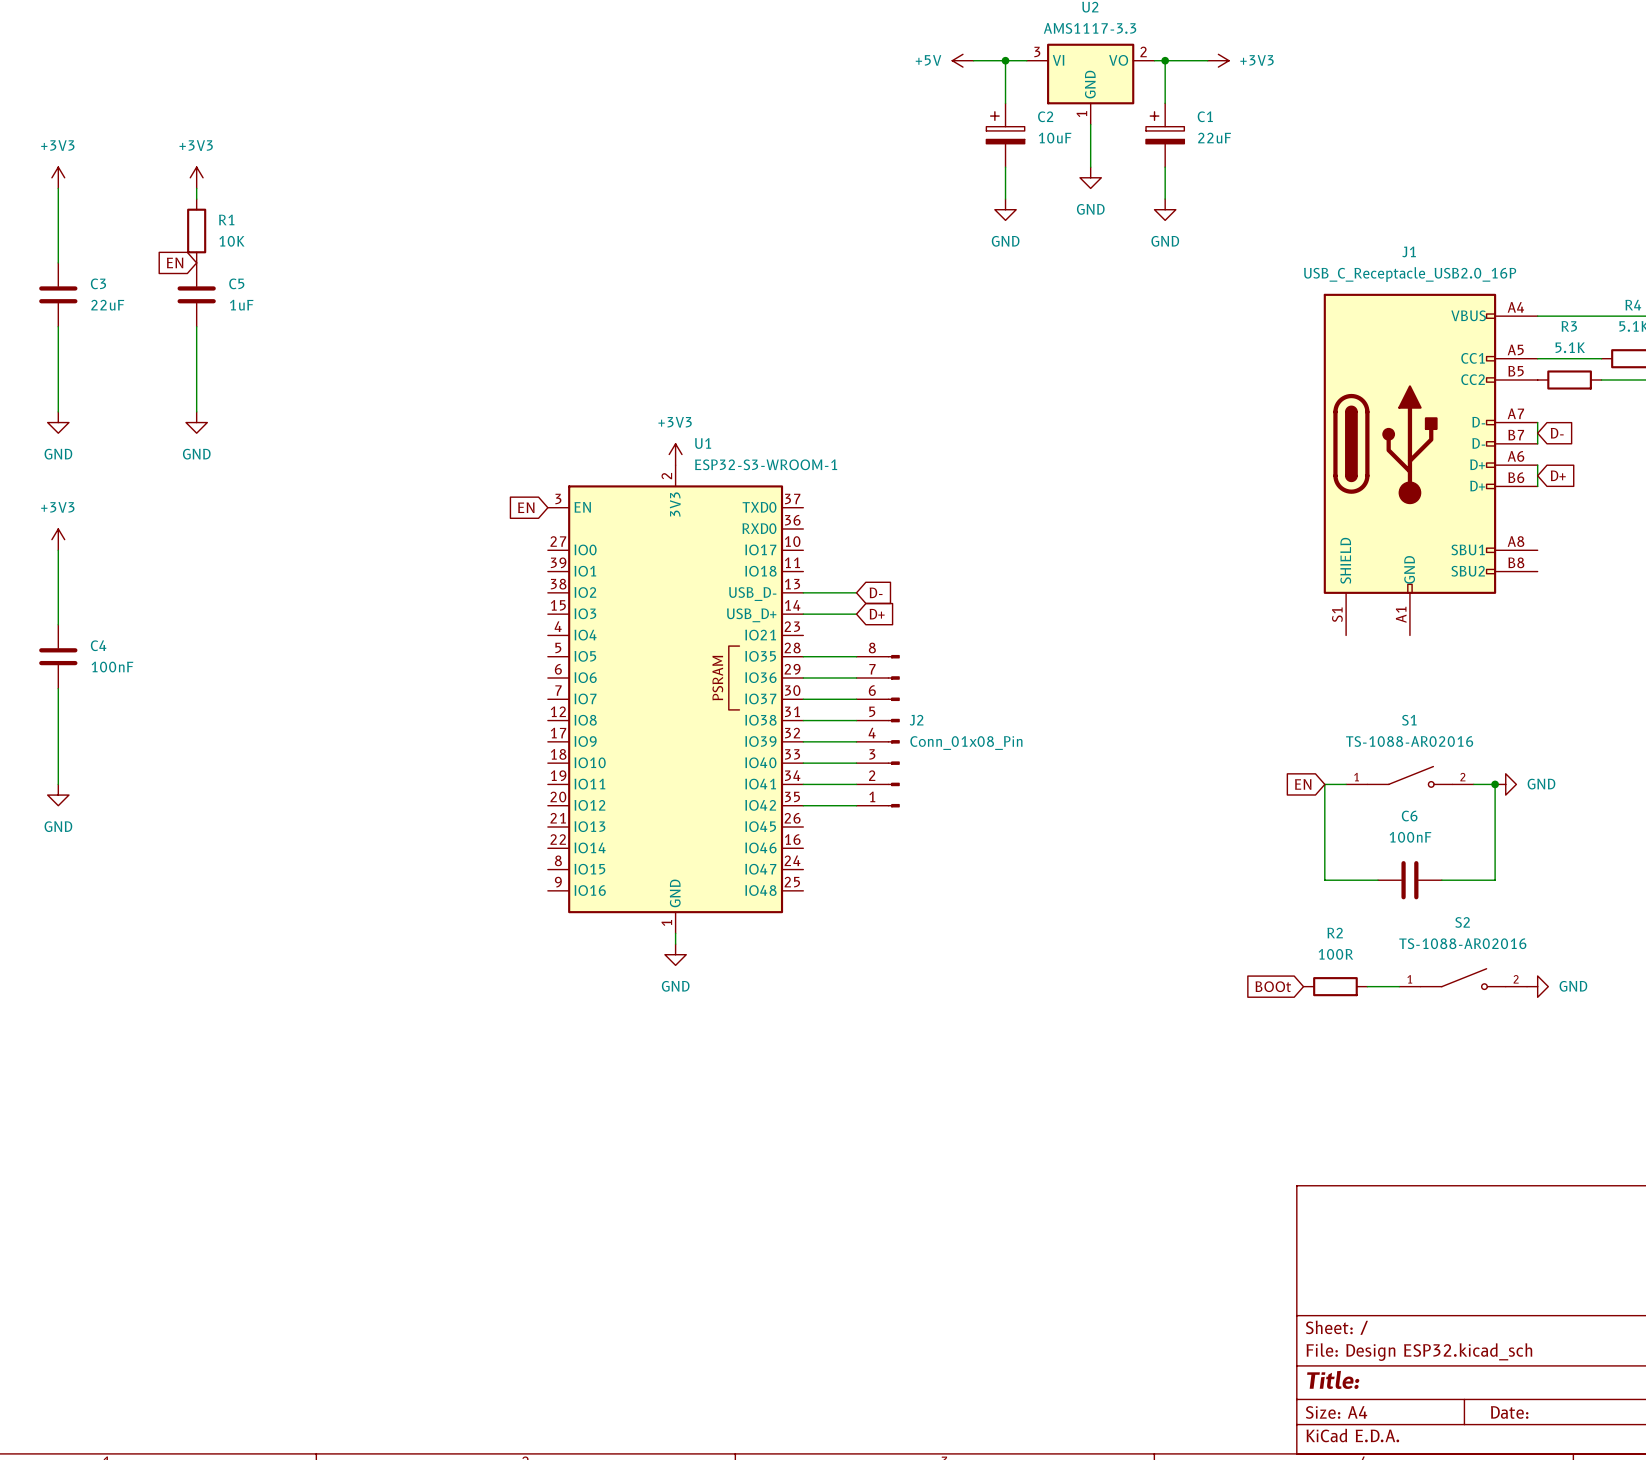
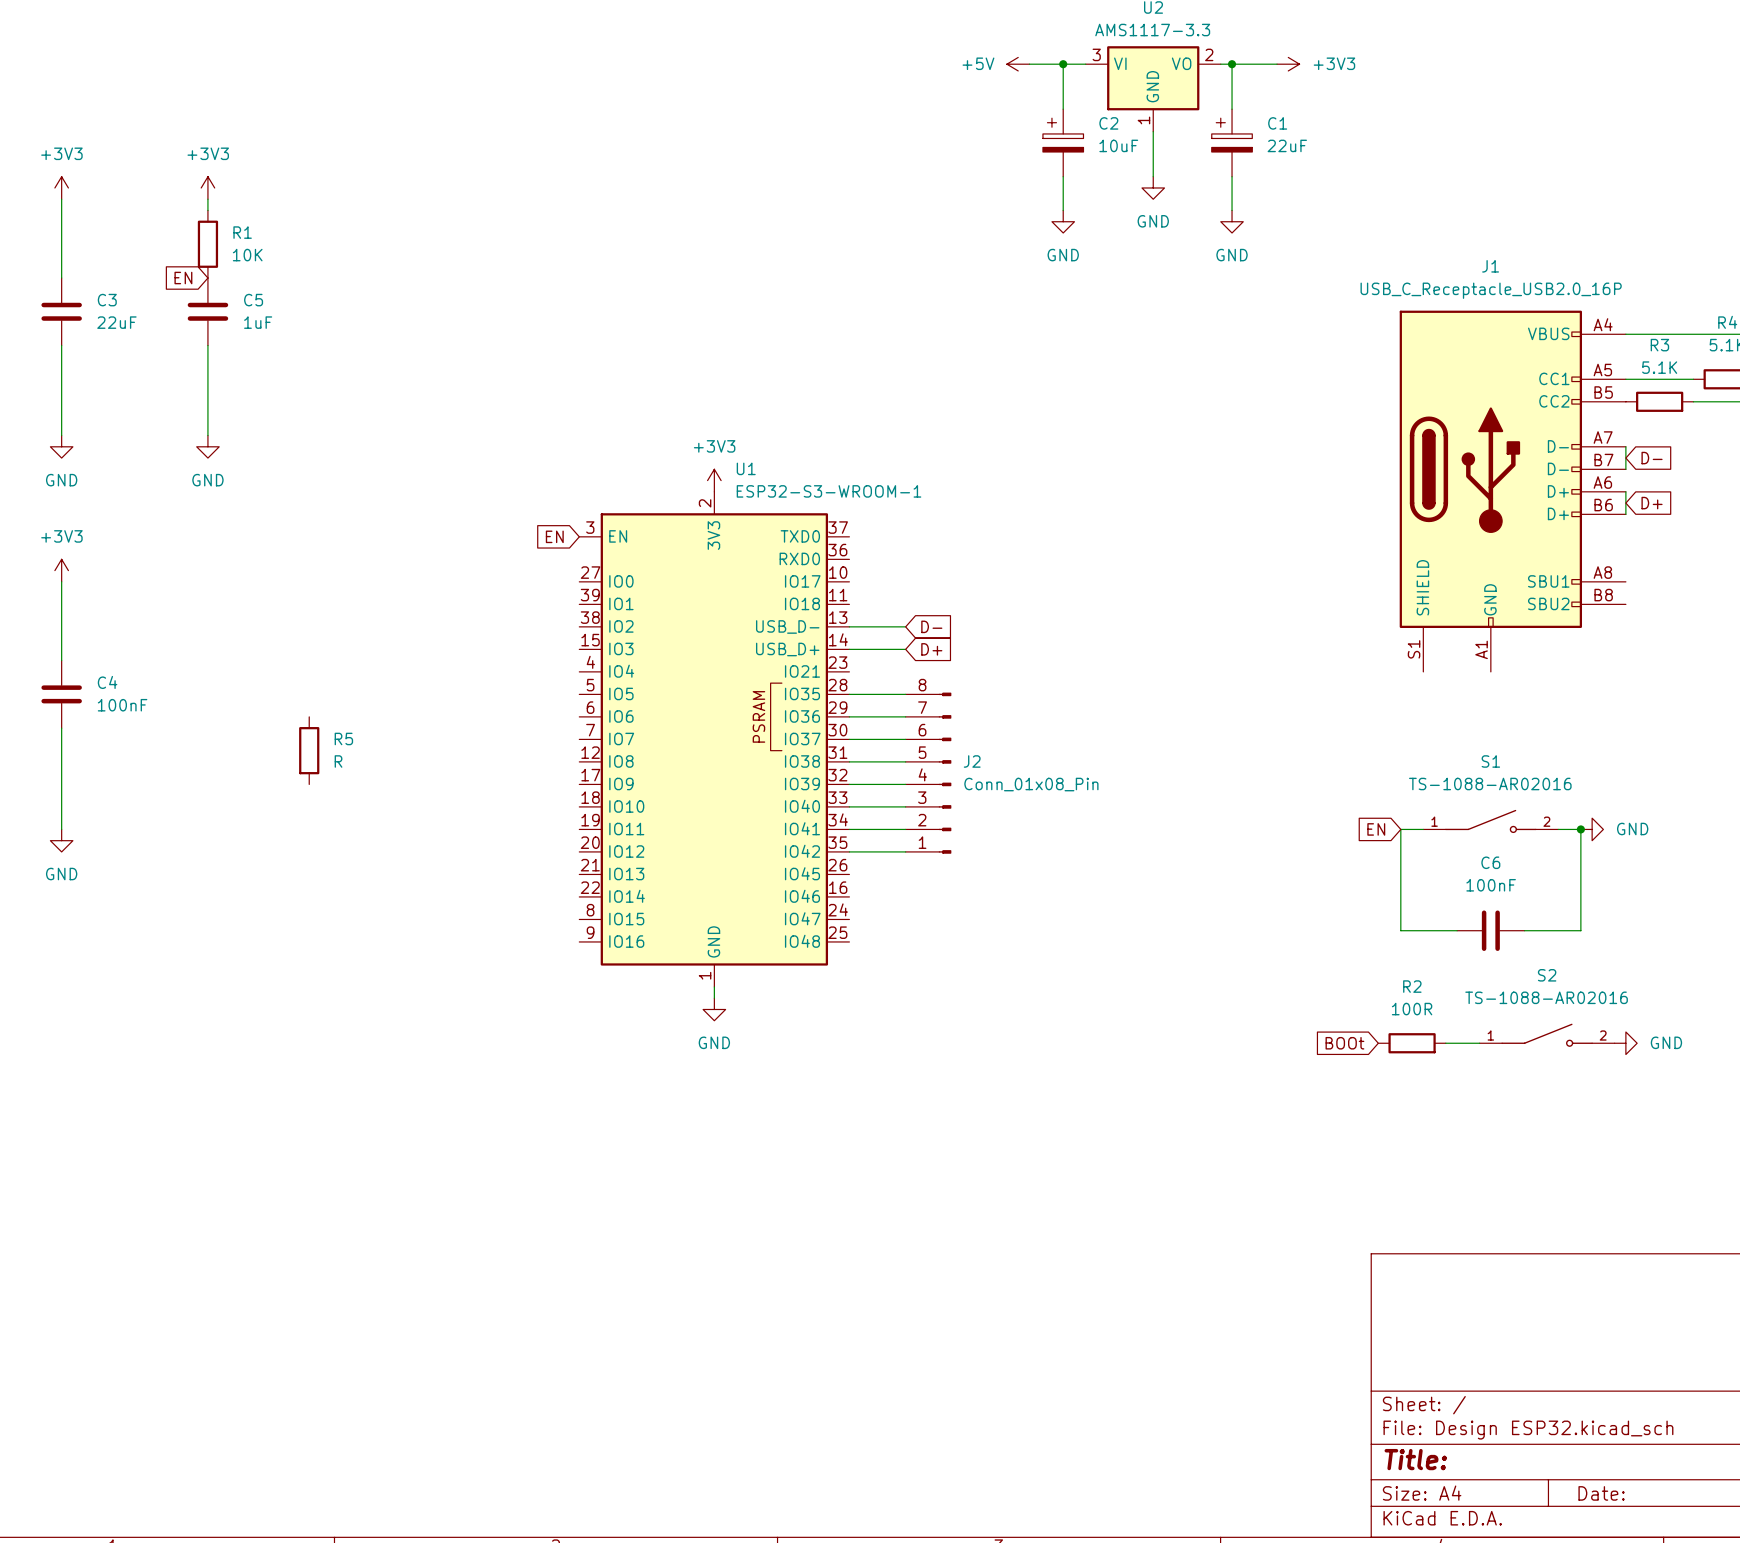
R5: none -> R (309, 750)

